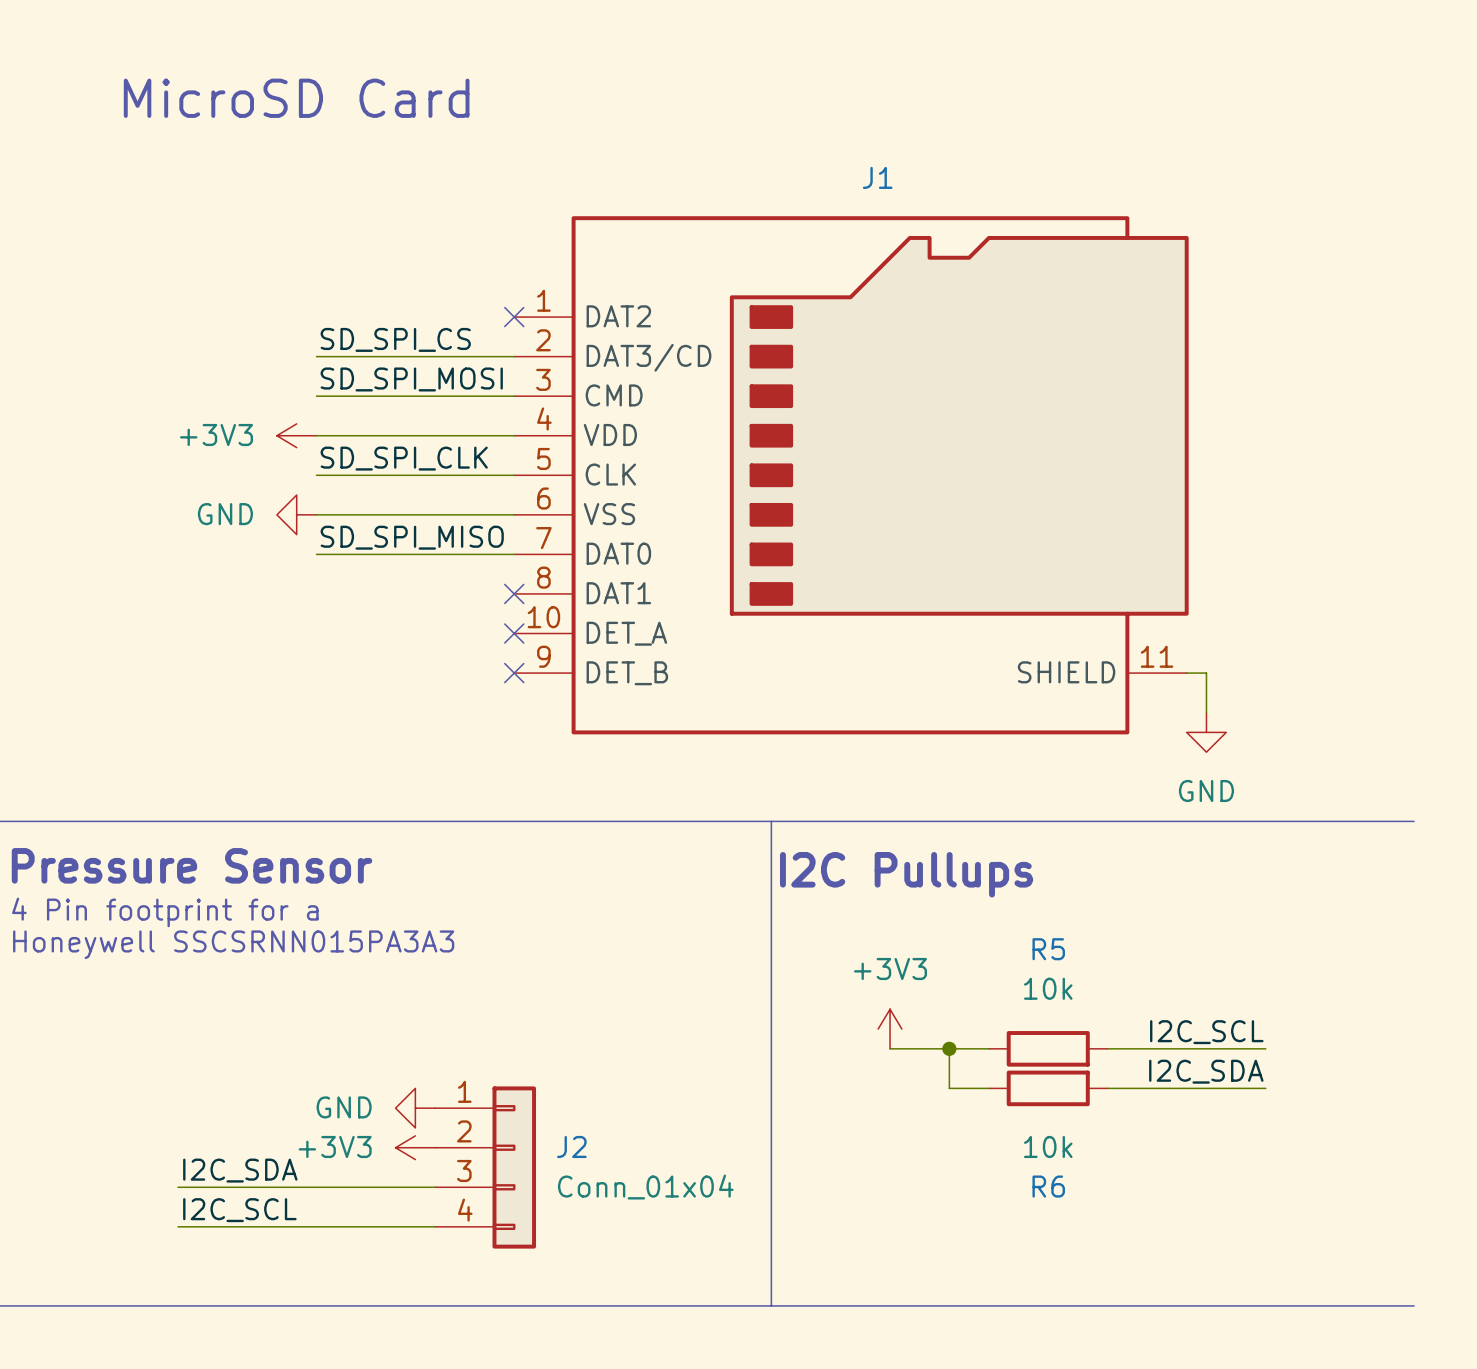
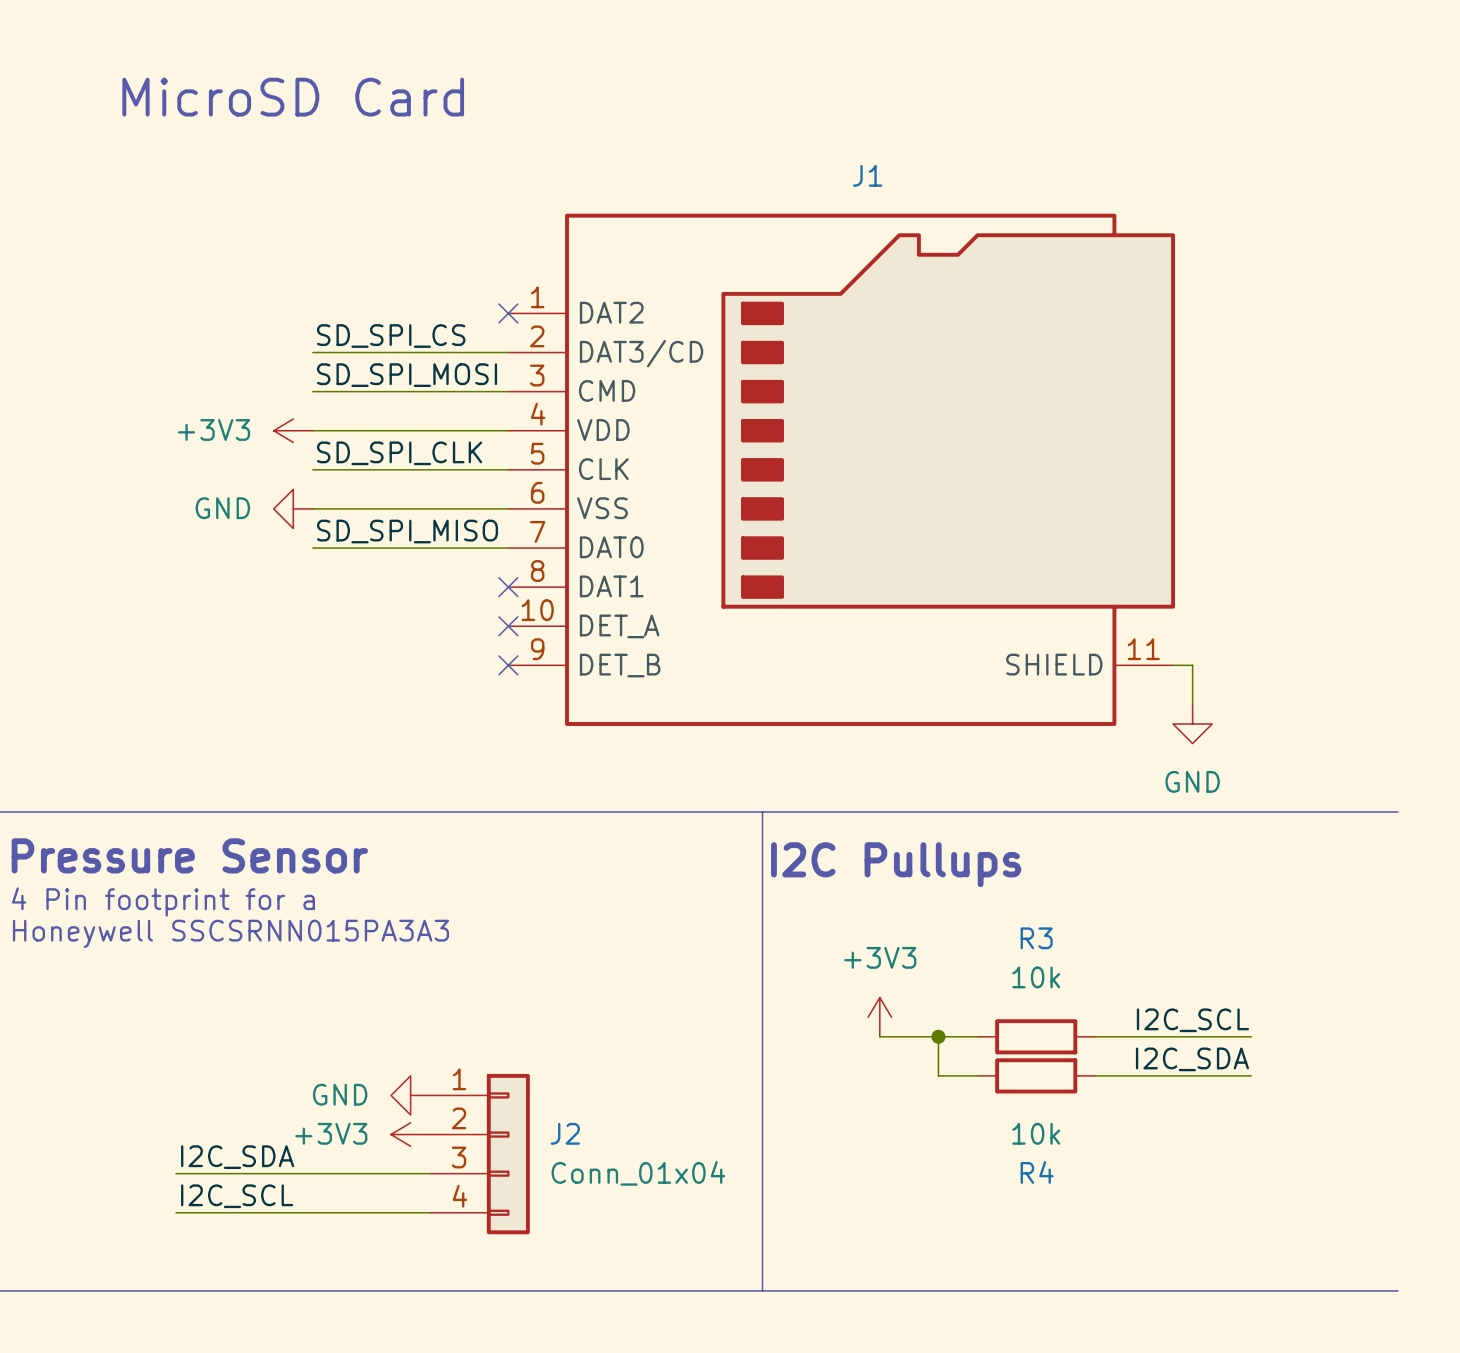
R5 name: R5 (1048, 949) -> R3 (1036, 938)
R6 name: R6 (1048, 1186) -> R4 (1037, 1172)

